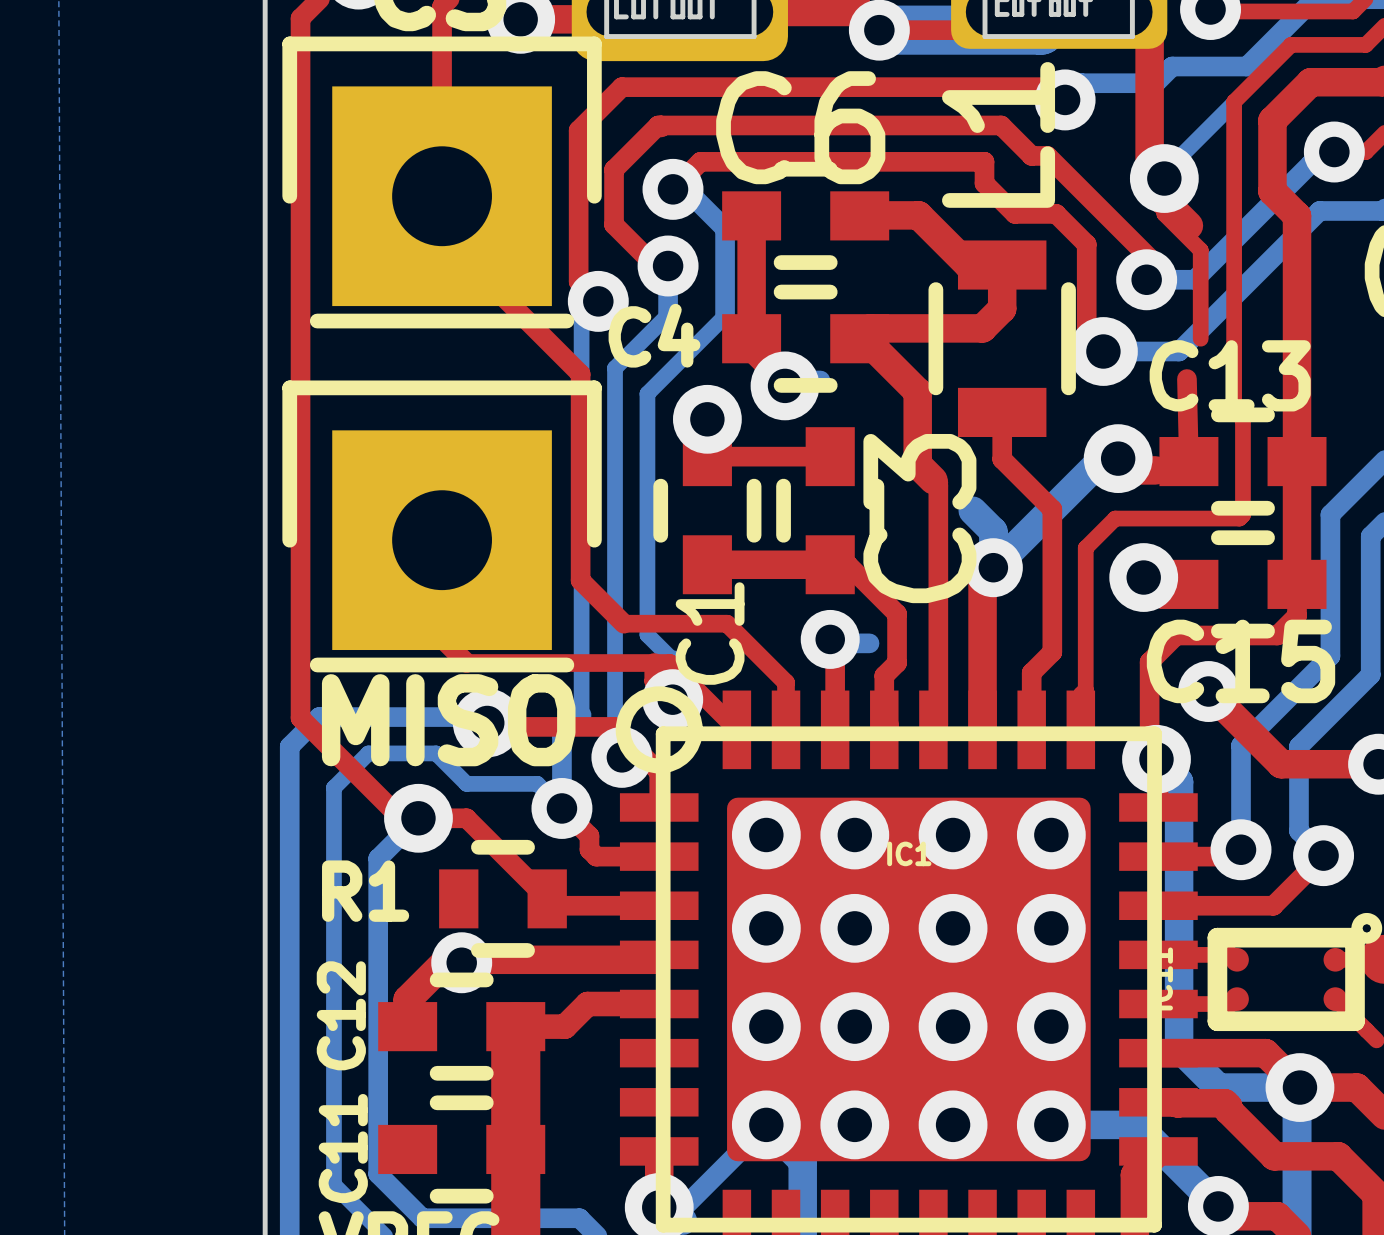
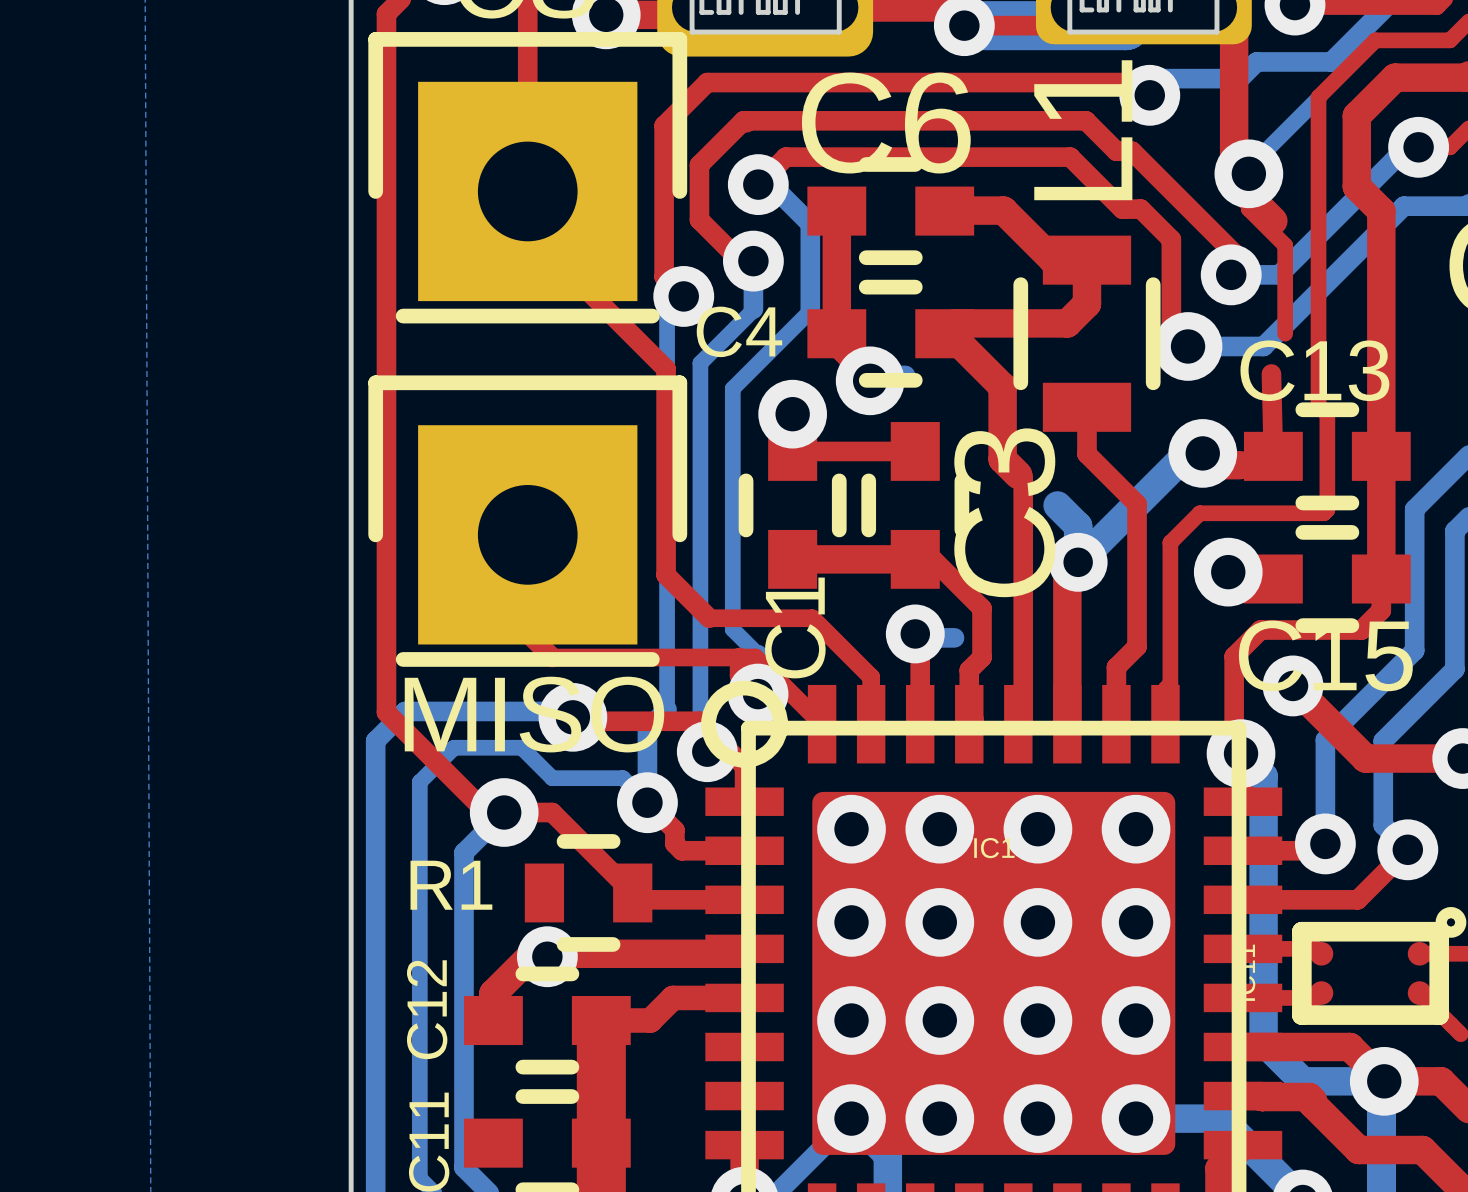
top track: (984, 161) (984, 183) (1014, 213) (1037, 213) -> (1070, 157) (1122, 209)

